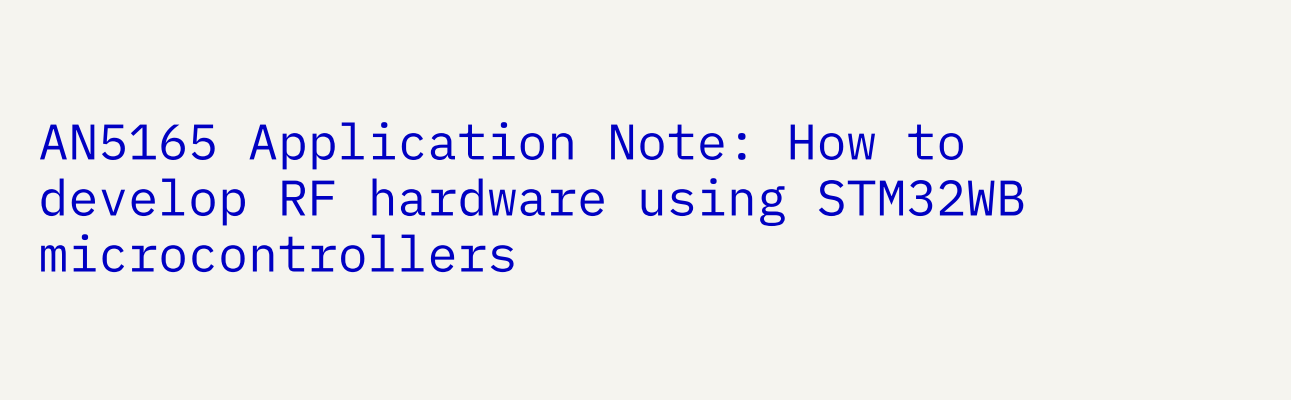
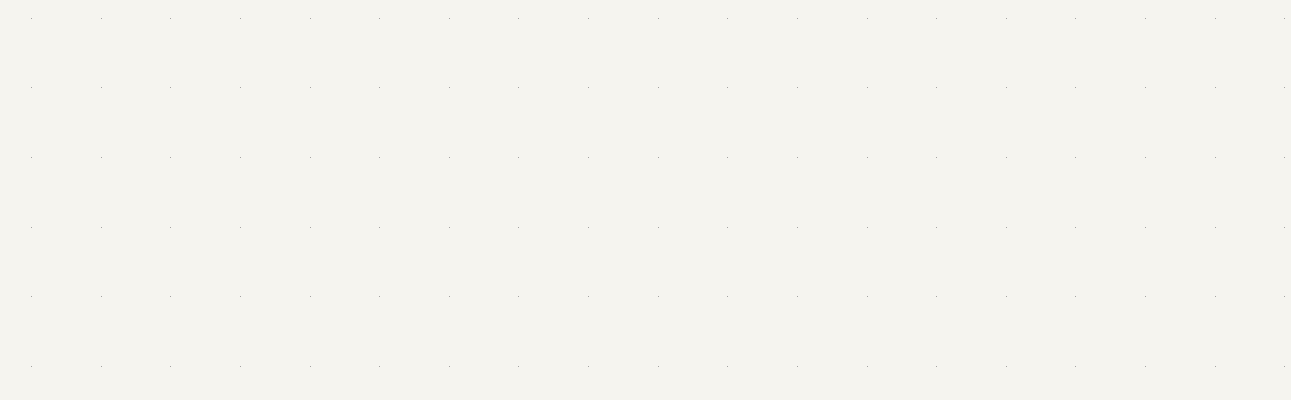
text: AN5165 Application Note: How to (501, 145) -> none
text: develop RF hardware using STM32WB (532, 202) -> none
text: microcontrollers (277, 253) -> none

